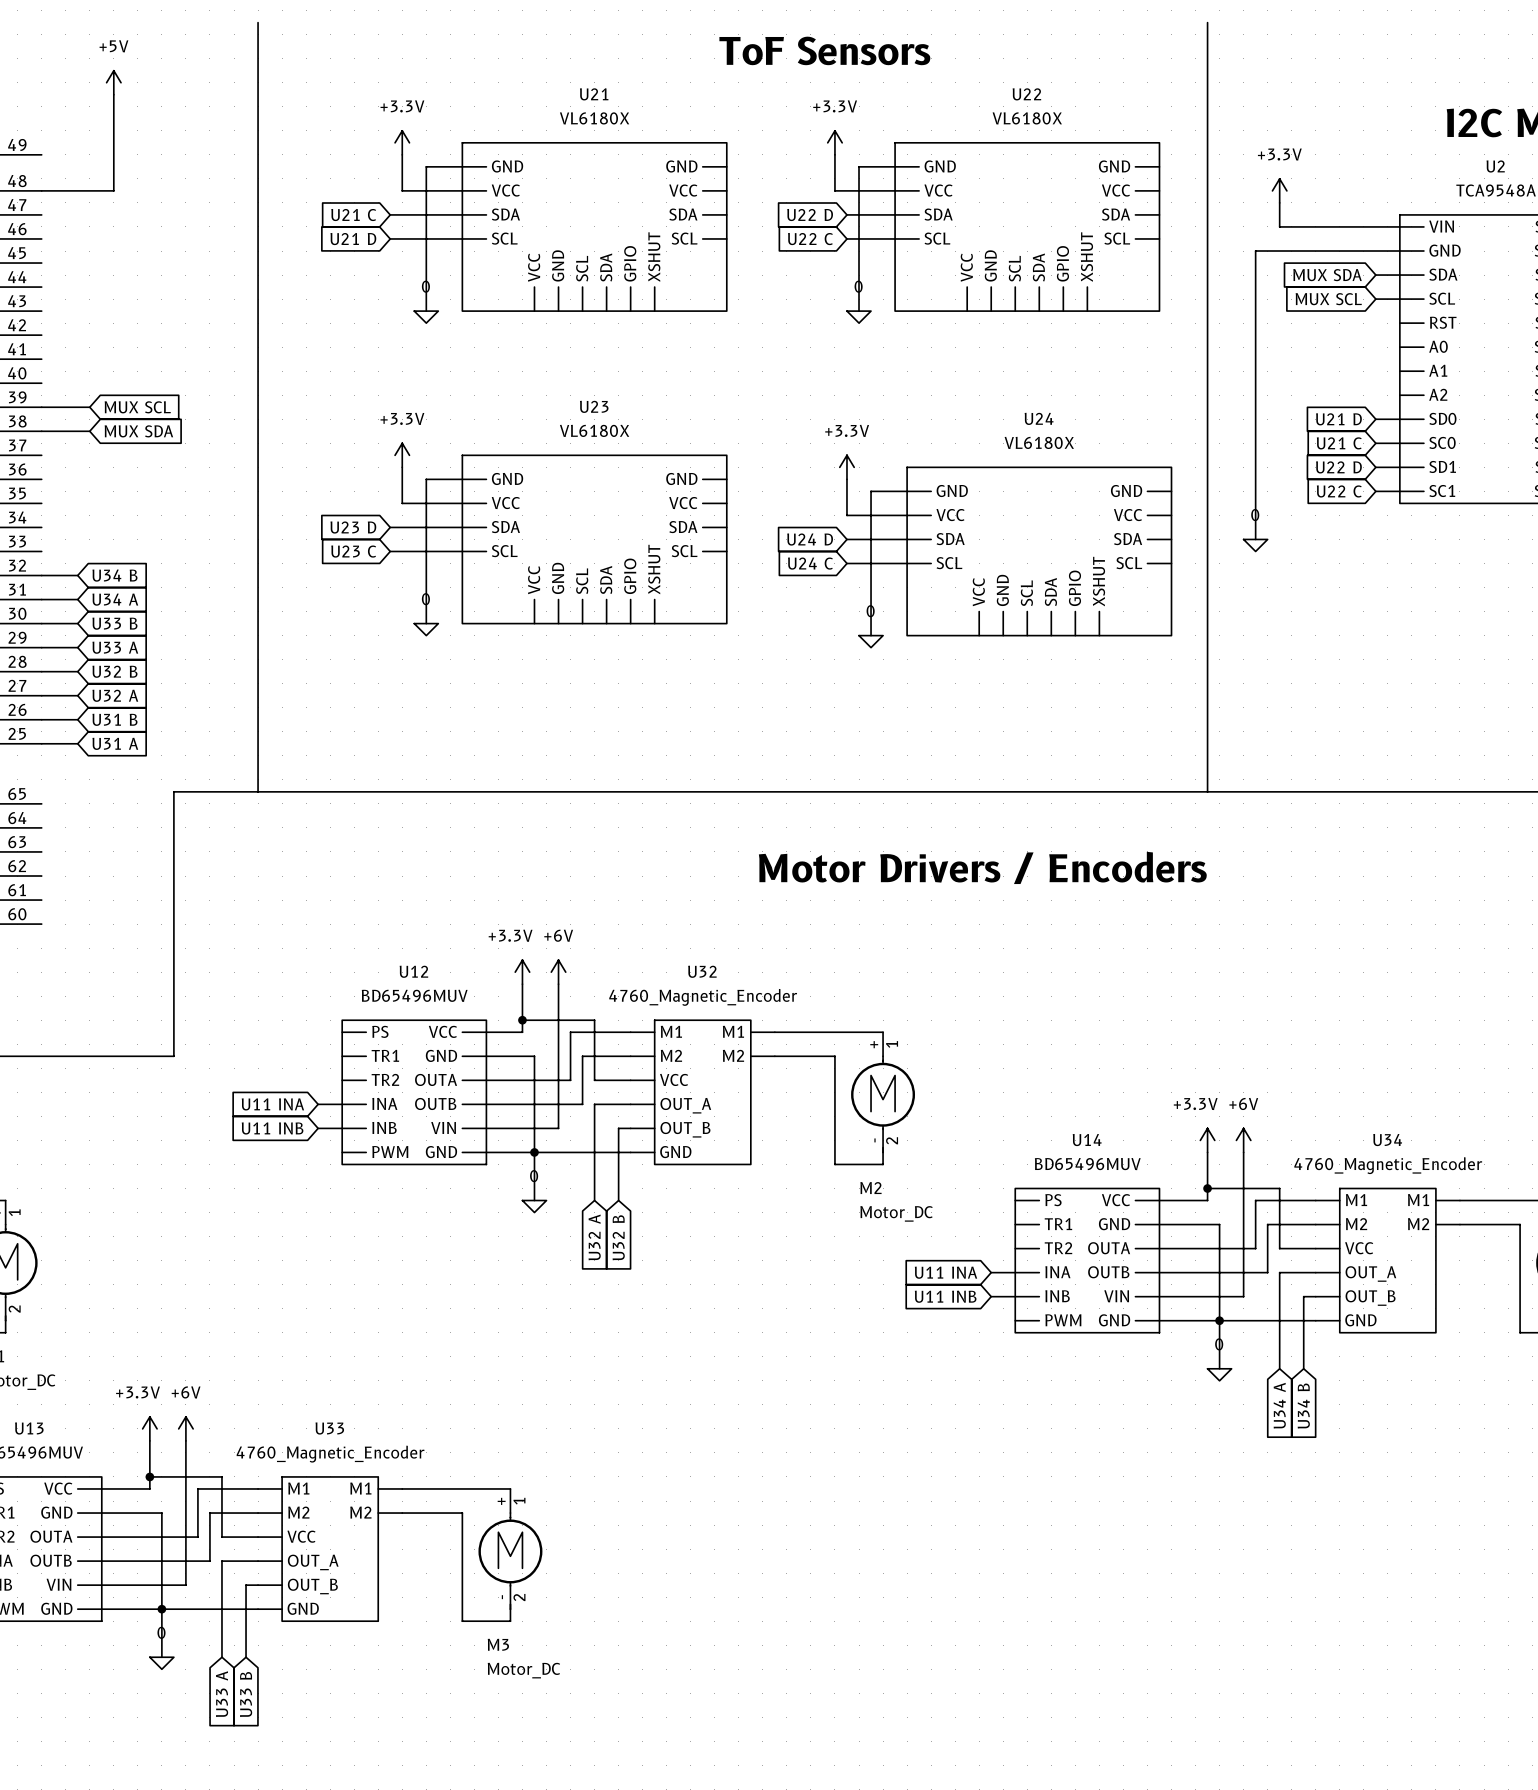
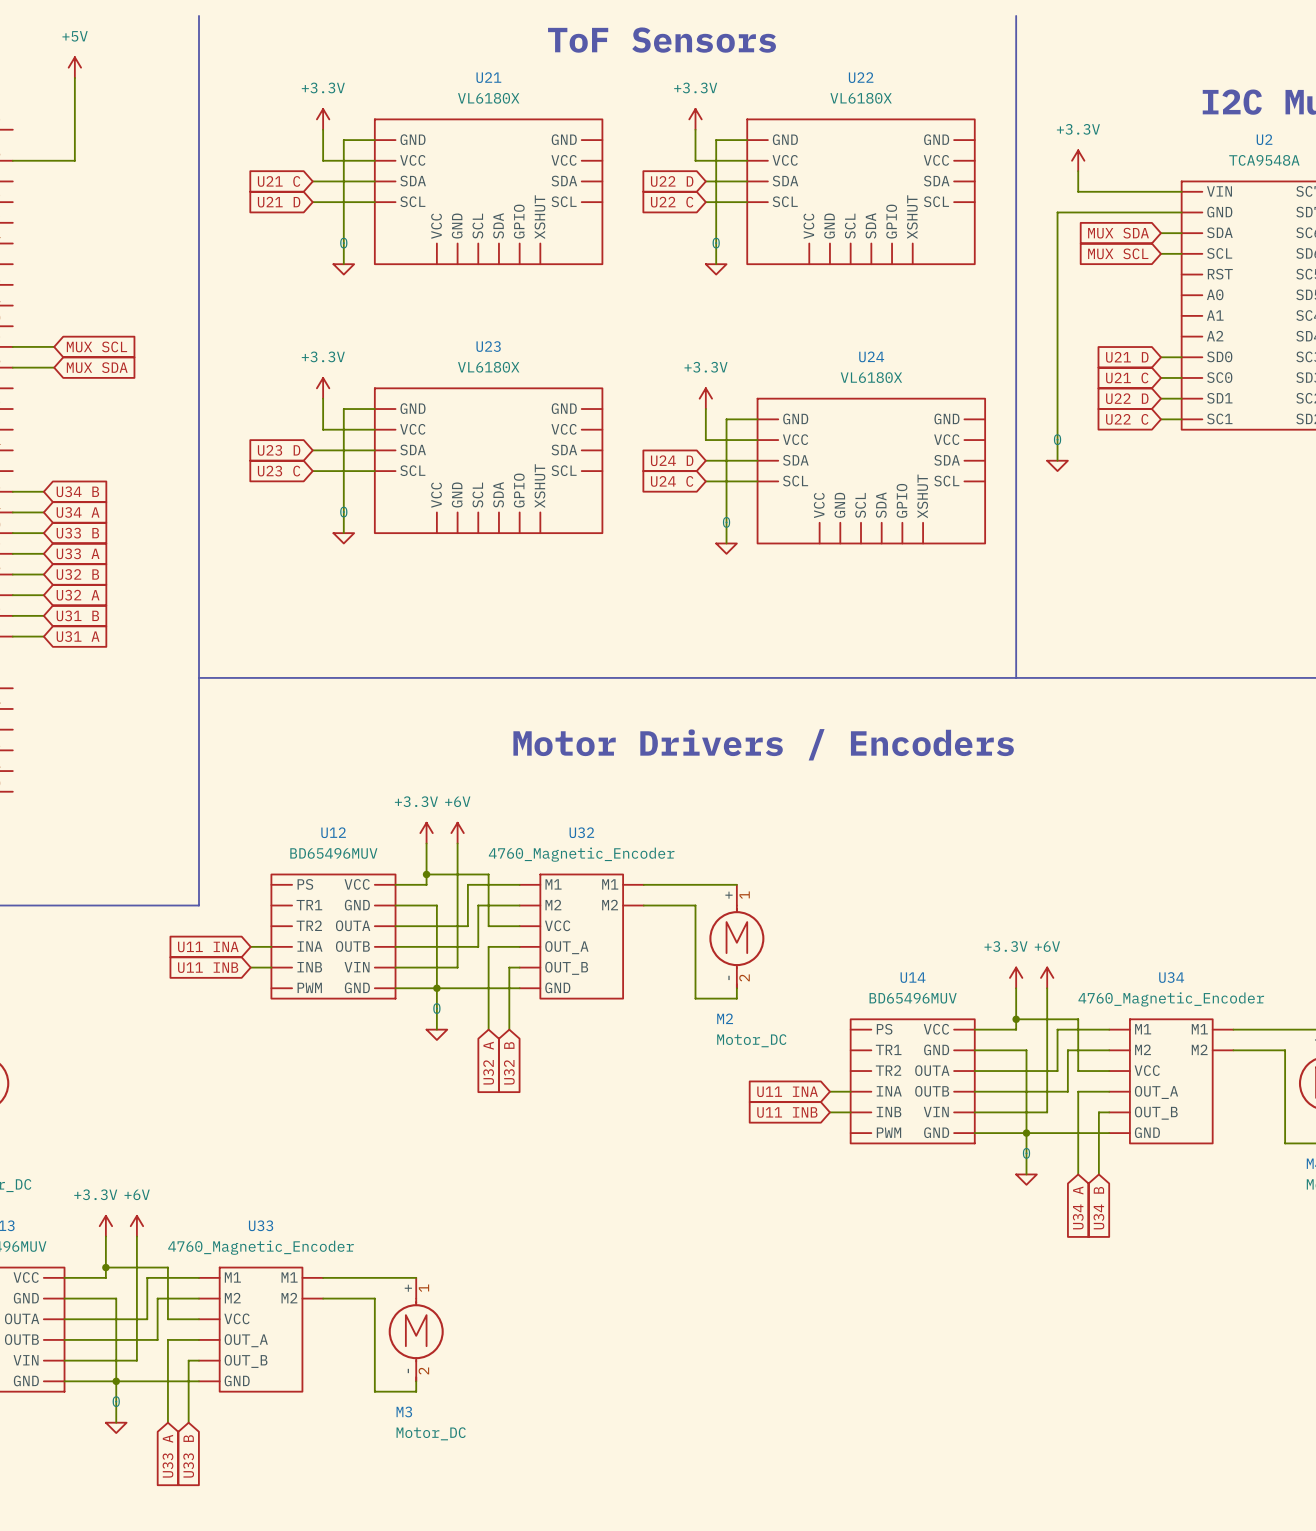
line: (258, 791) (173, 791) (173, 1056) -> (198, 677) (198, 905) (126, 905)

